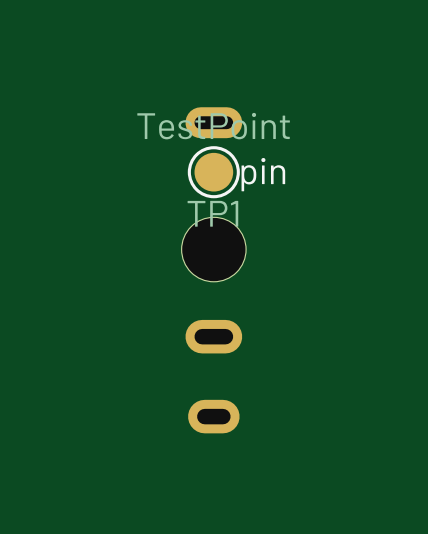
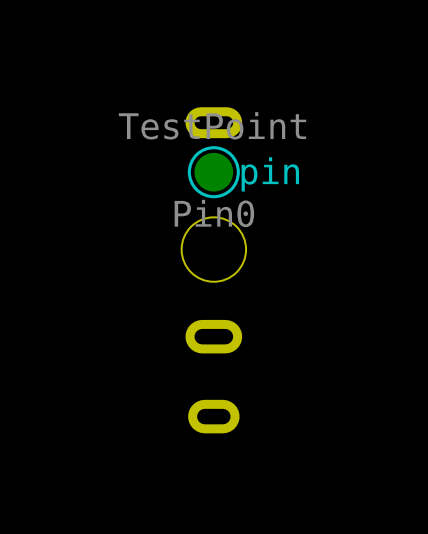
TP1 name: TP1 (212, 213) -> Pin0 (214, 213)

